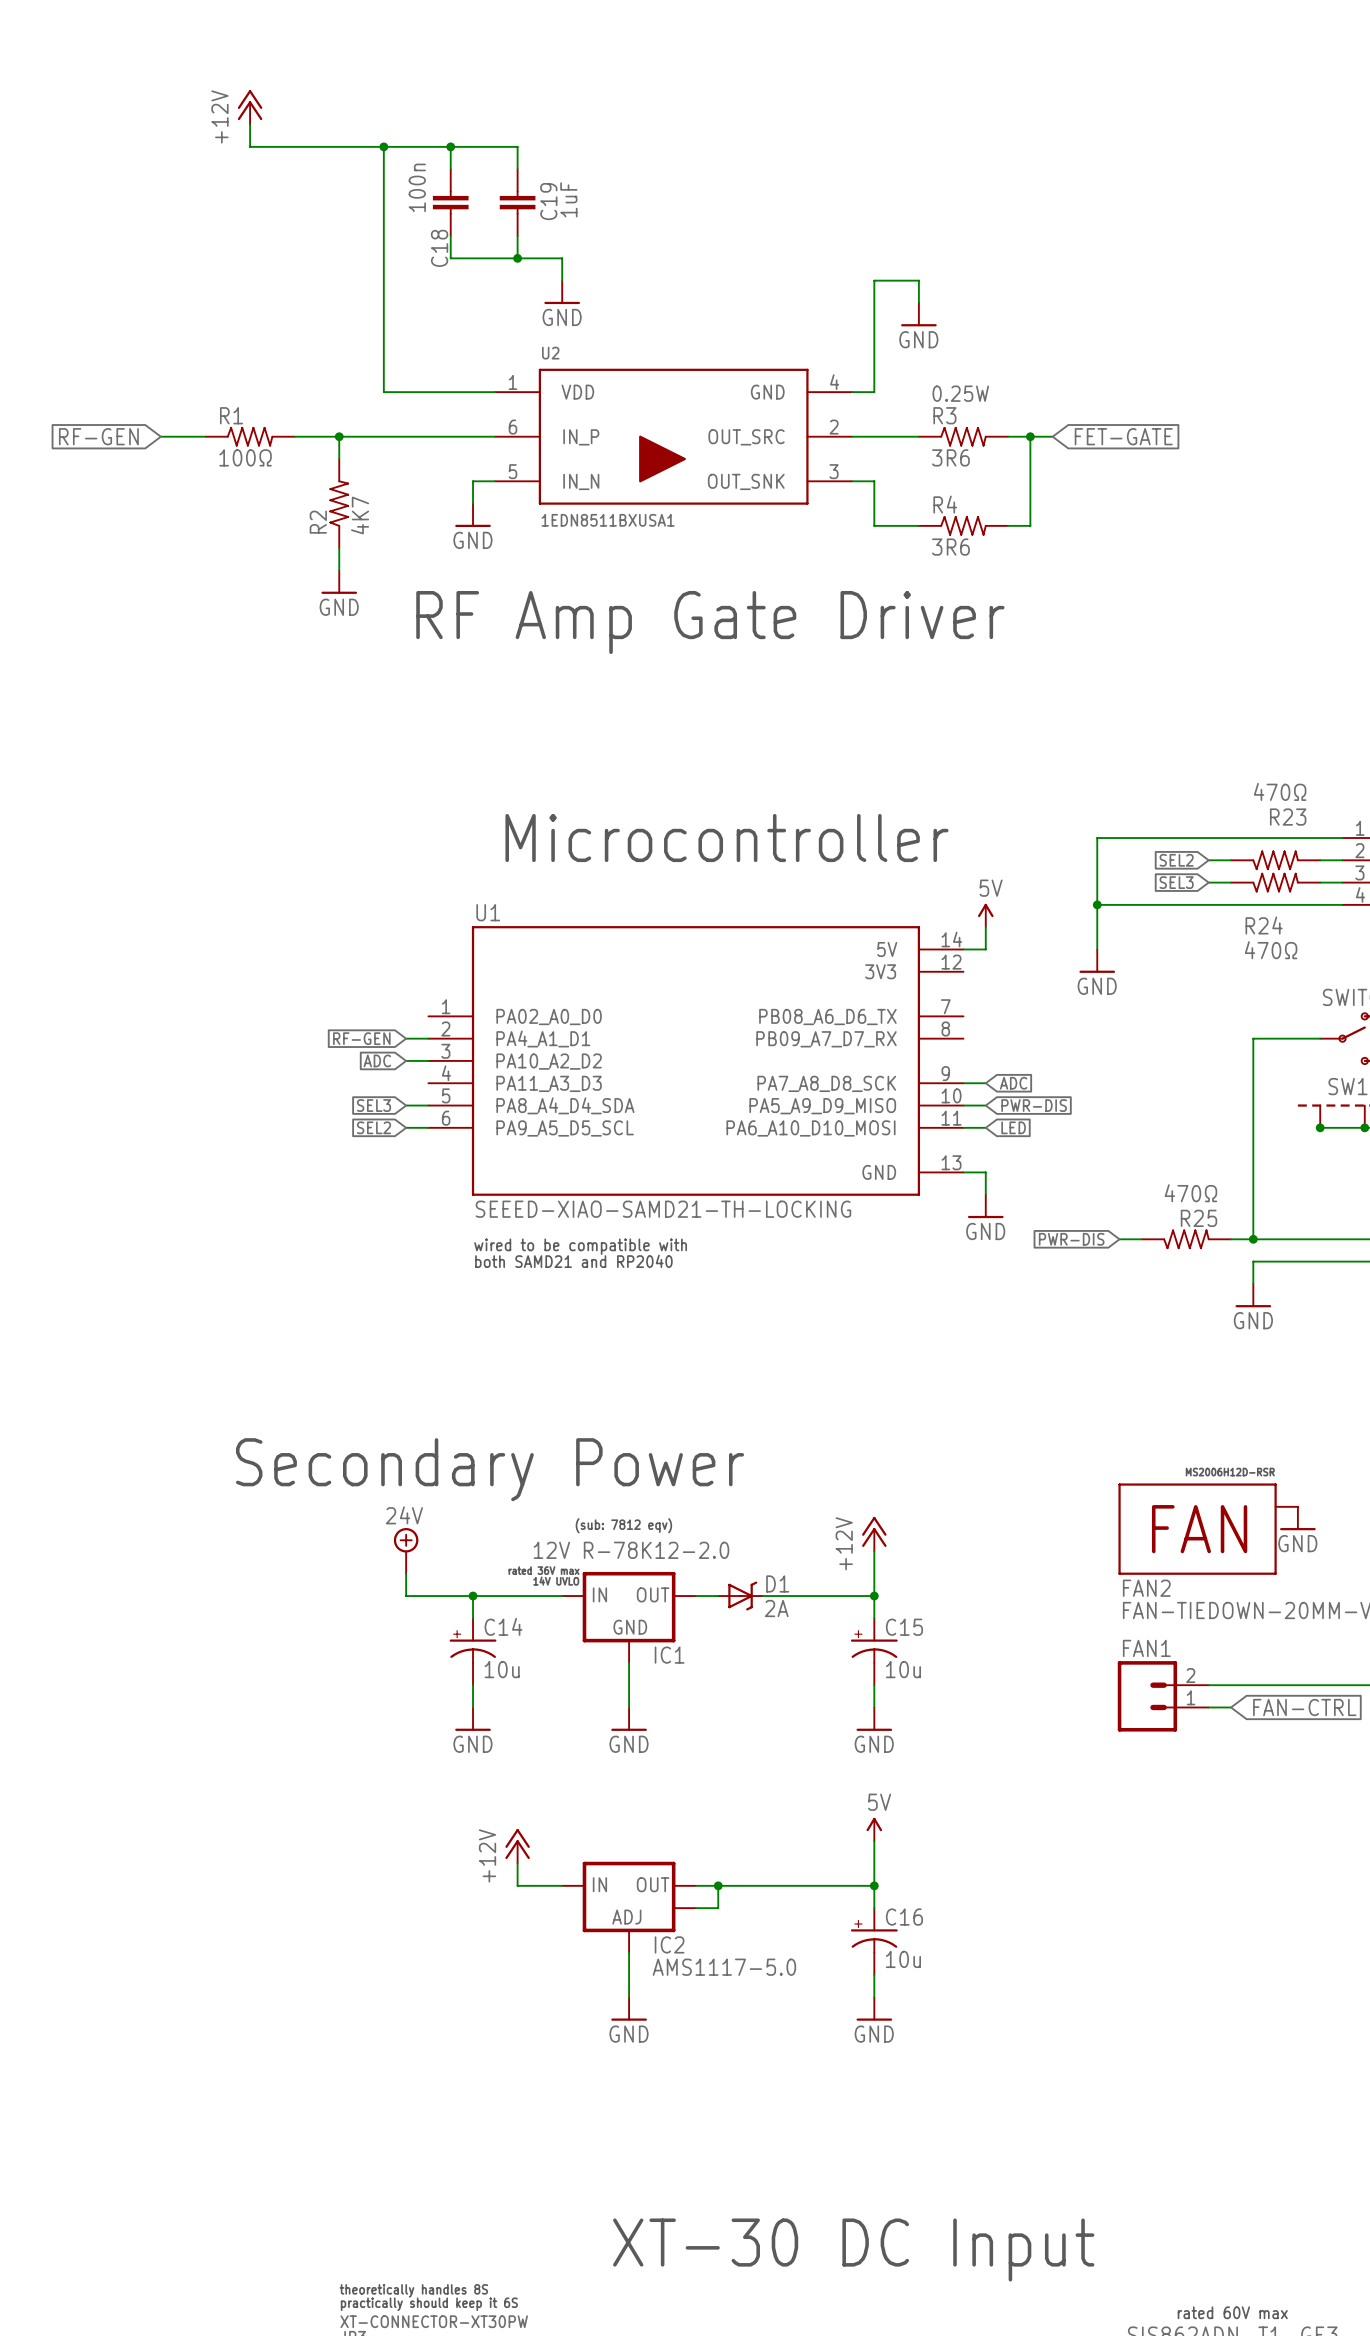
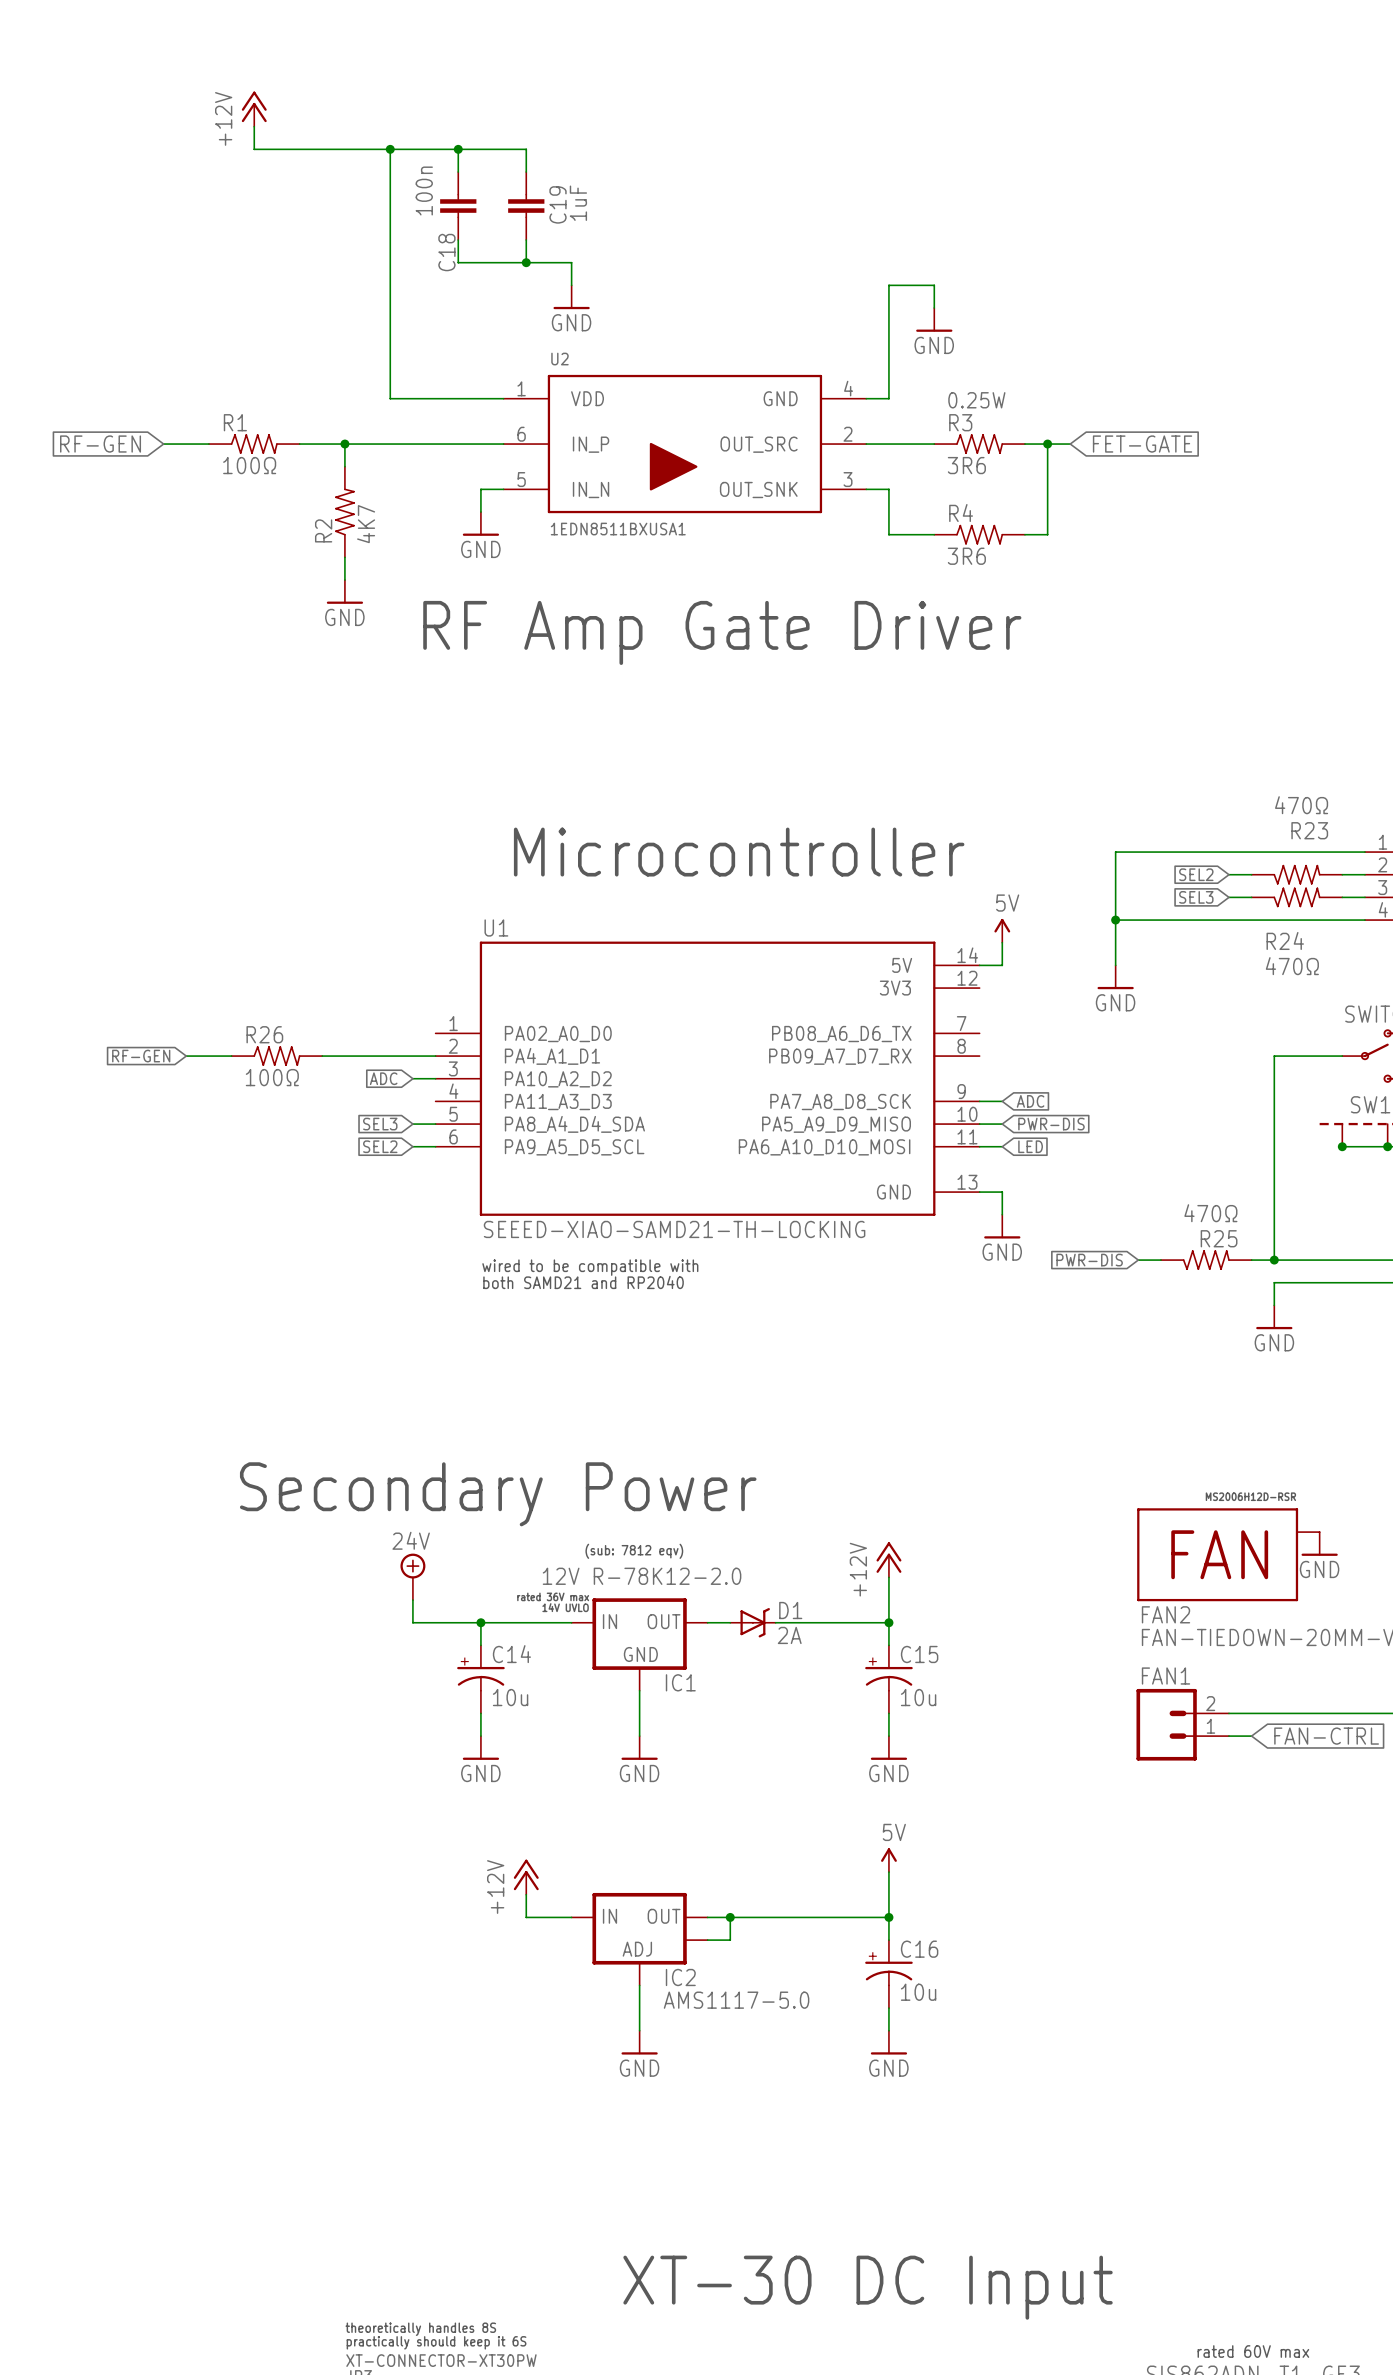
global label: none -> RF-GEN (141, 1056)
wire: none -> (186, 1056) (231, 1056)
R26: none -> 100Ω (276, 1056)
wire: none -> (322, 1056) (412, 1056)
global label: RF-GEN (361, 1038) -> none

